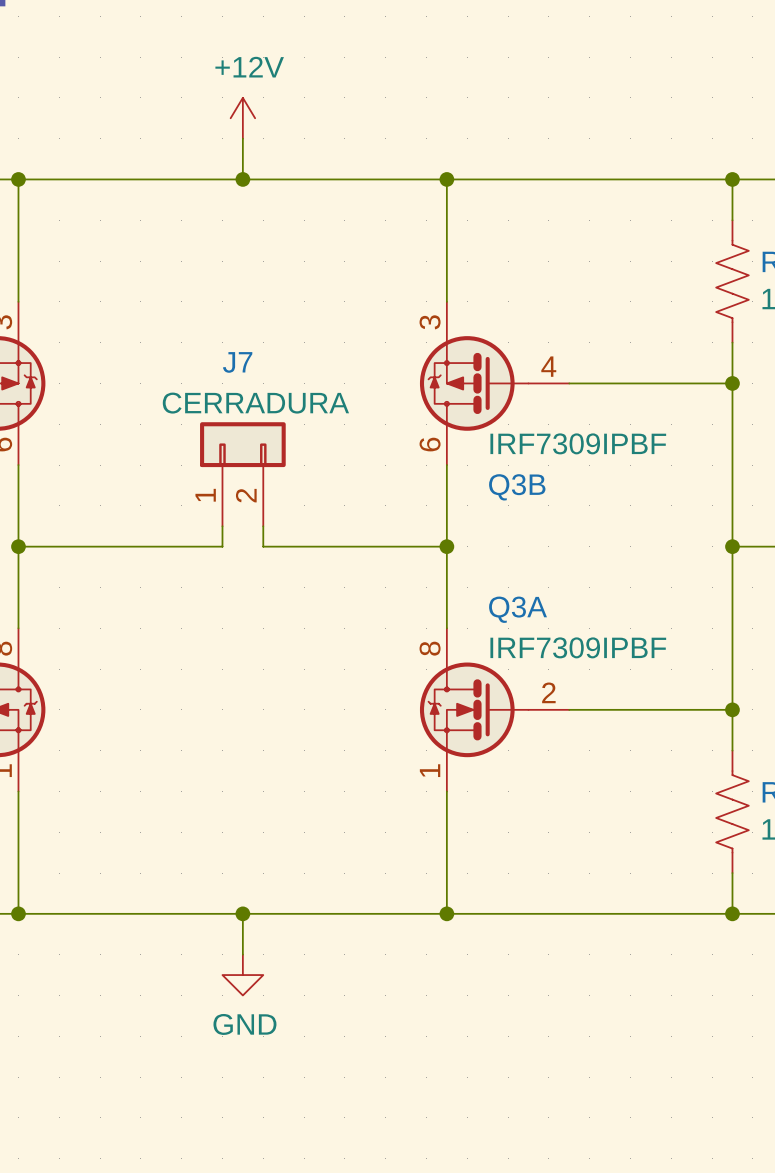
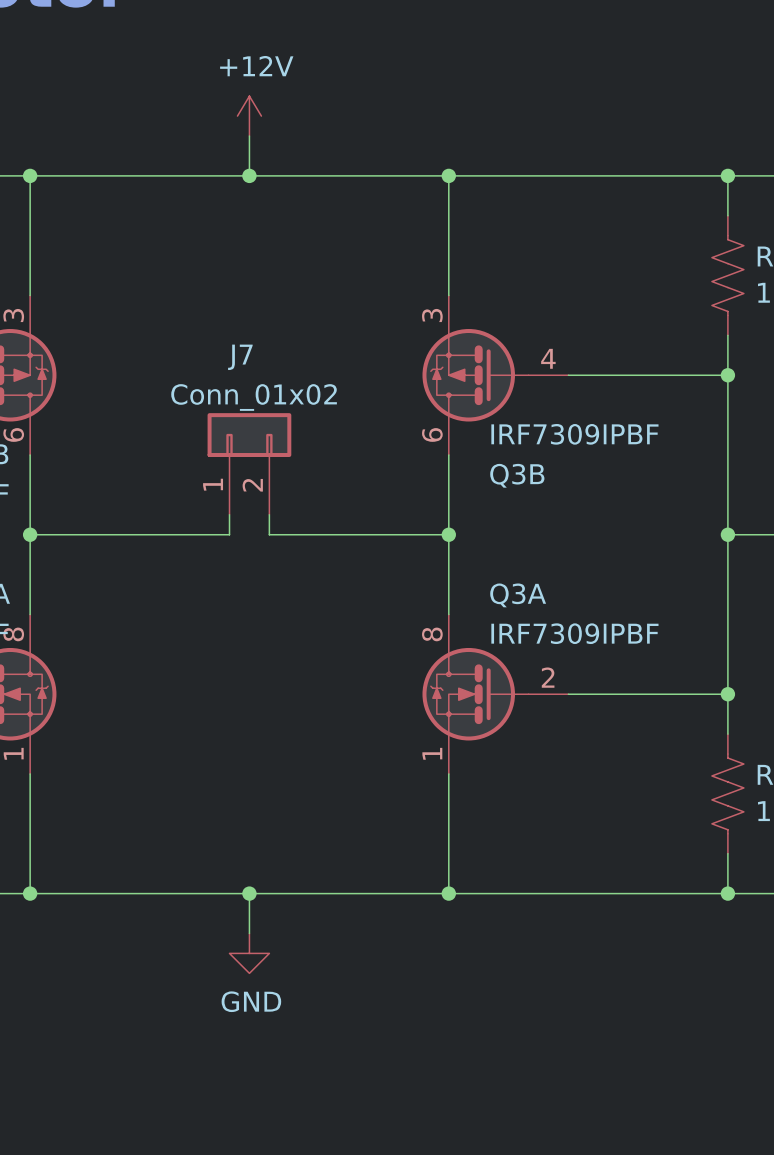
J7 value: CERRADURA (255, 403) -> Conn_01x02 (254, 397)

